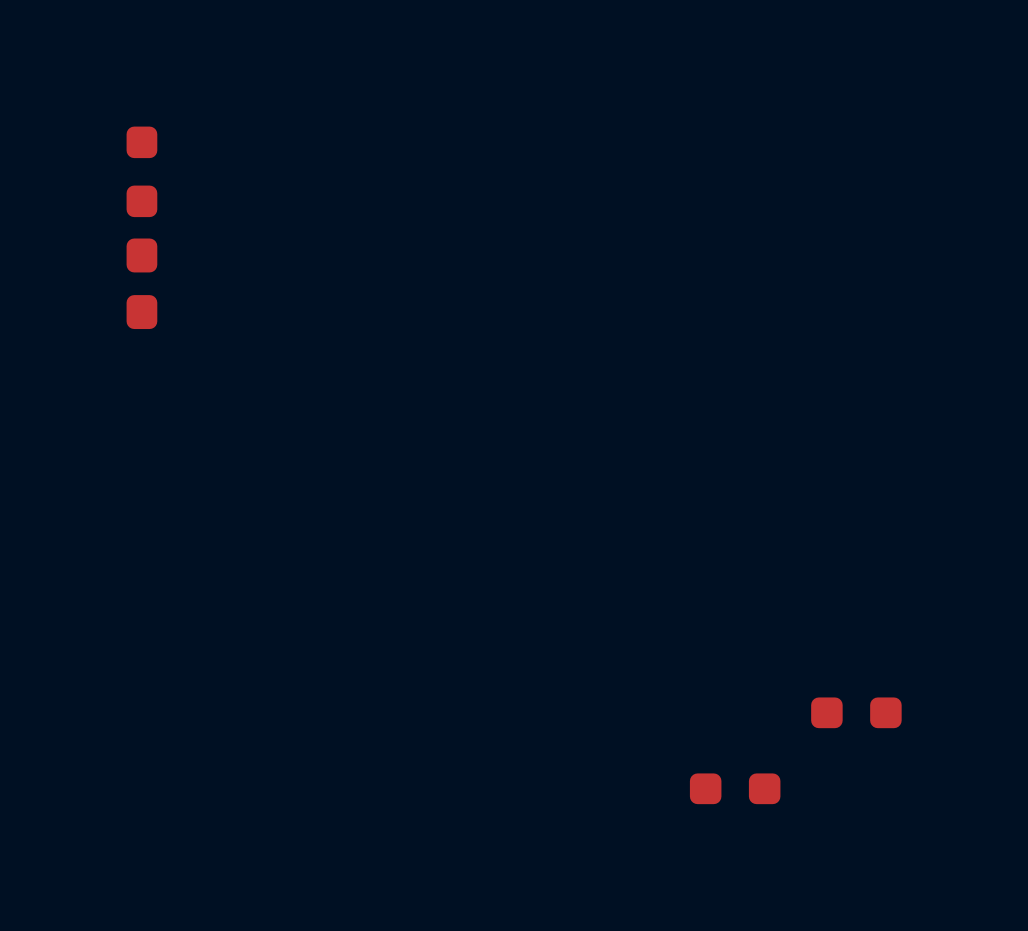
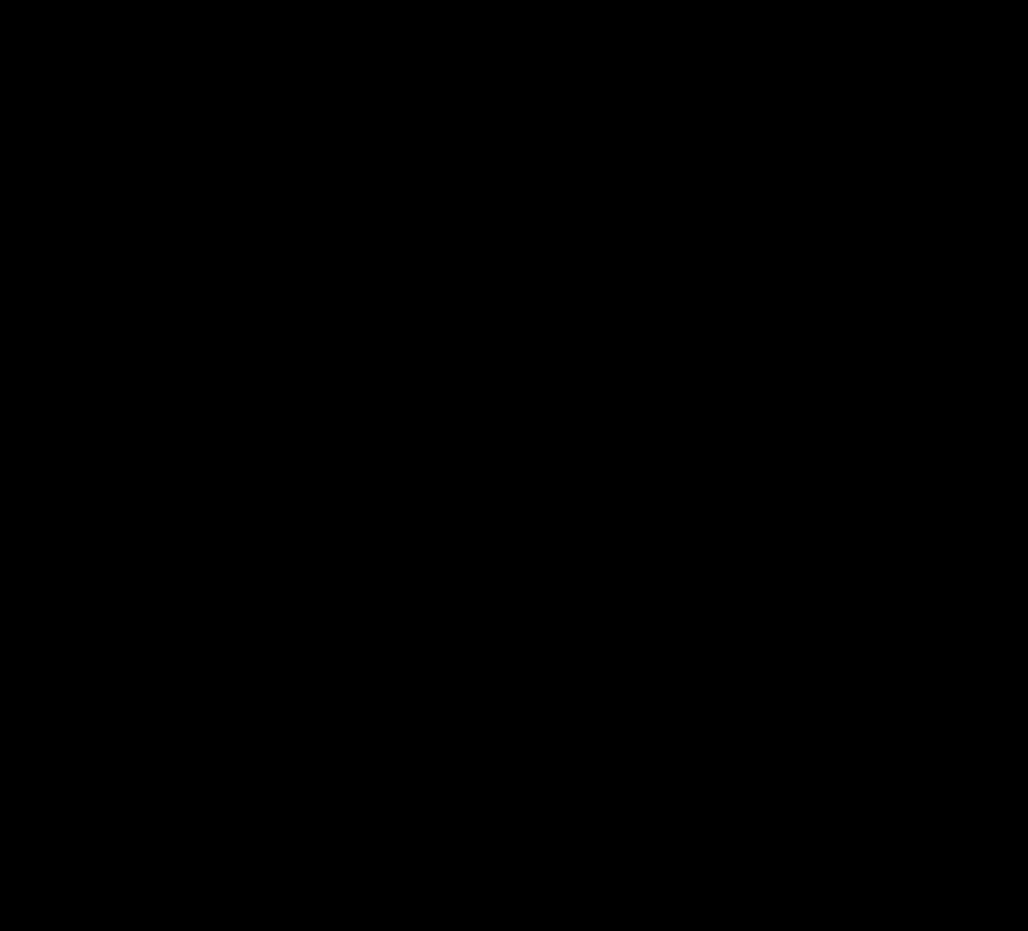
part: (141, 171) -> none
part: (141, 283) -> none
part: (856, 712) -> none
part: (735, 788) -> none

